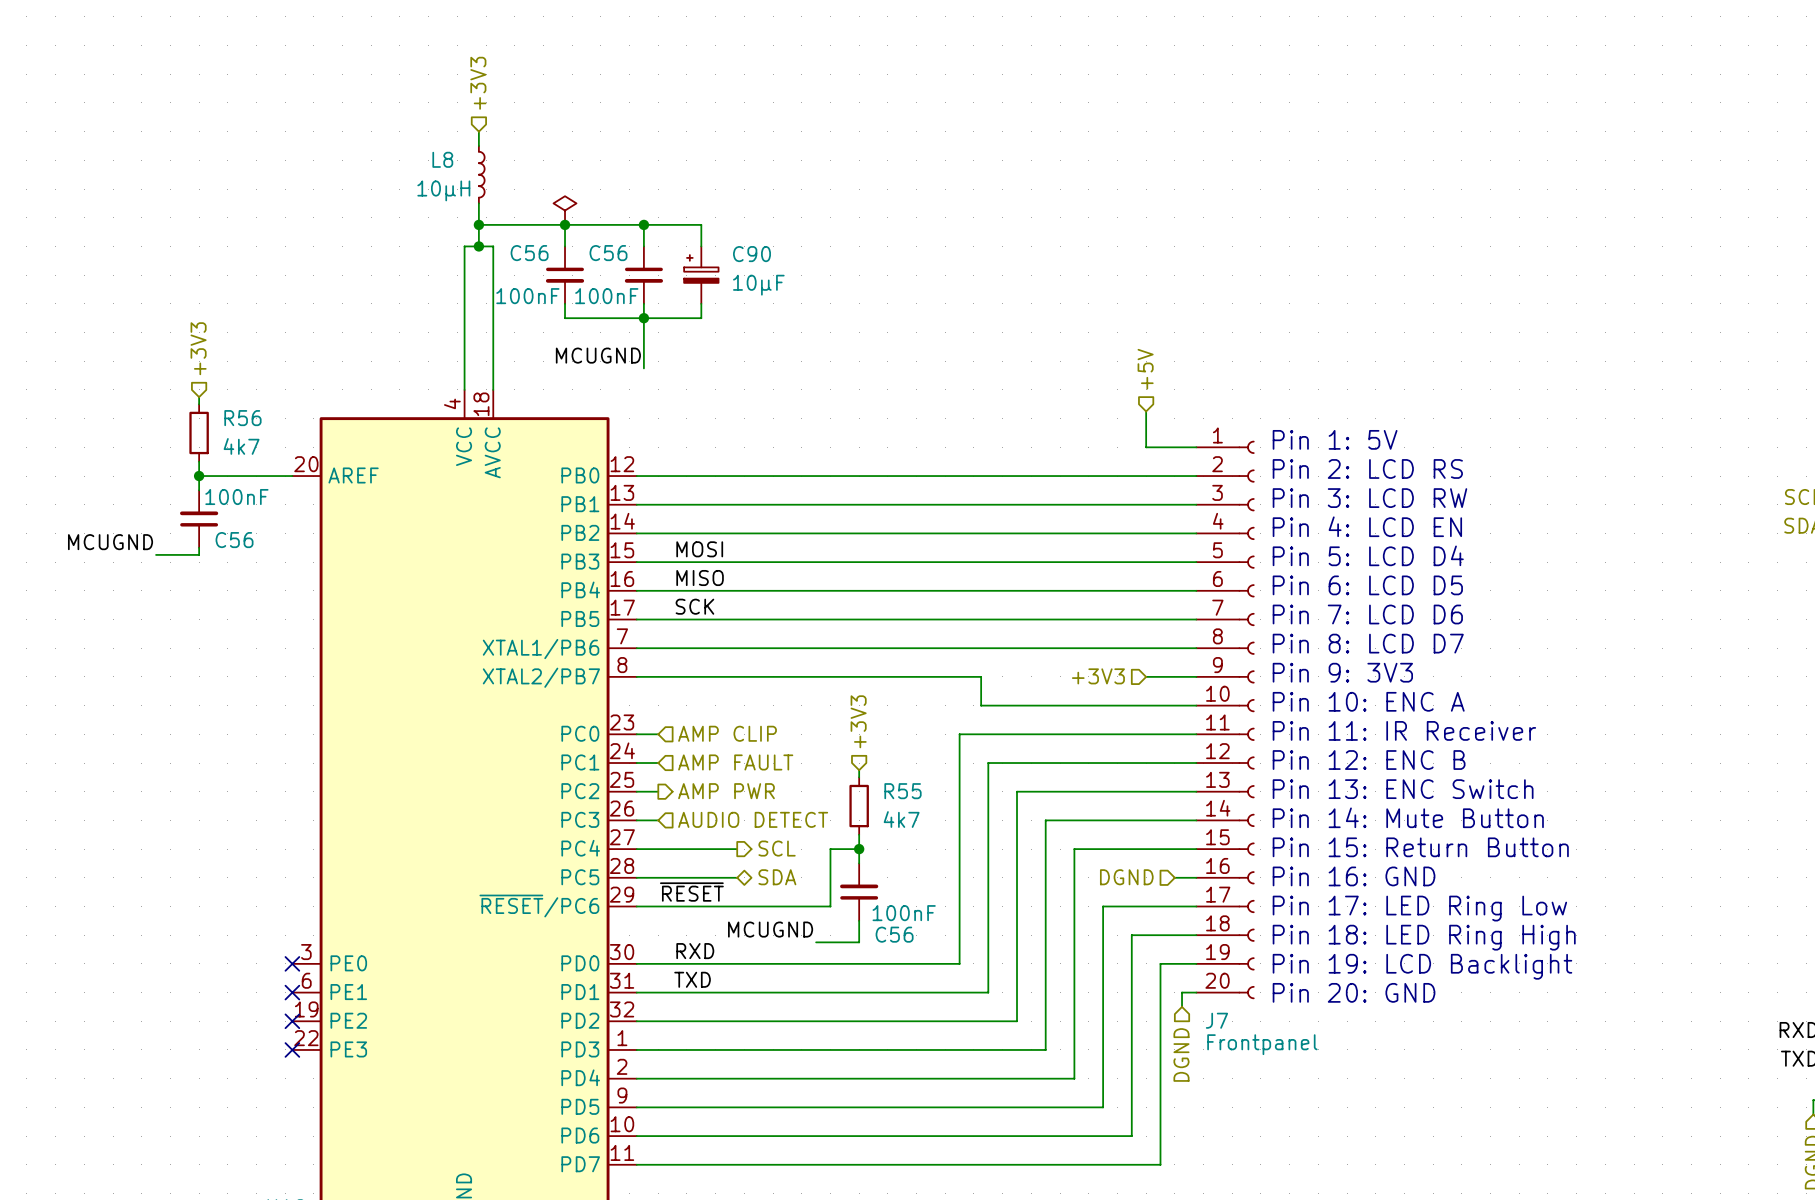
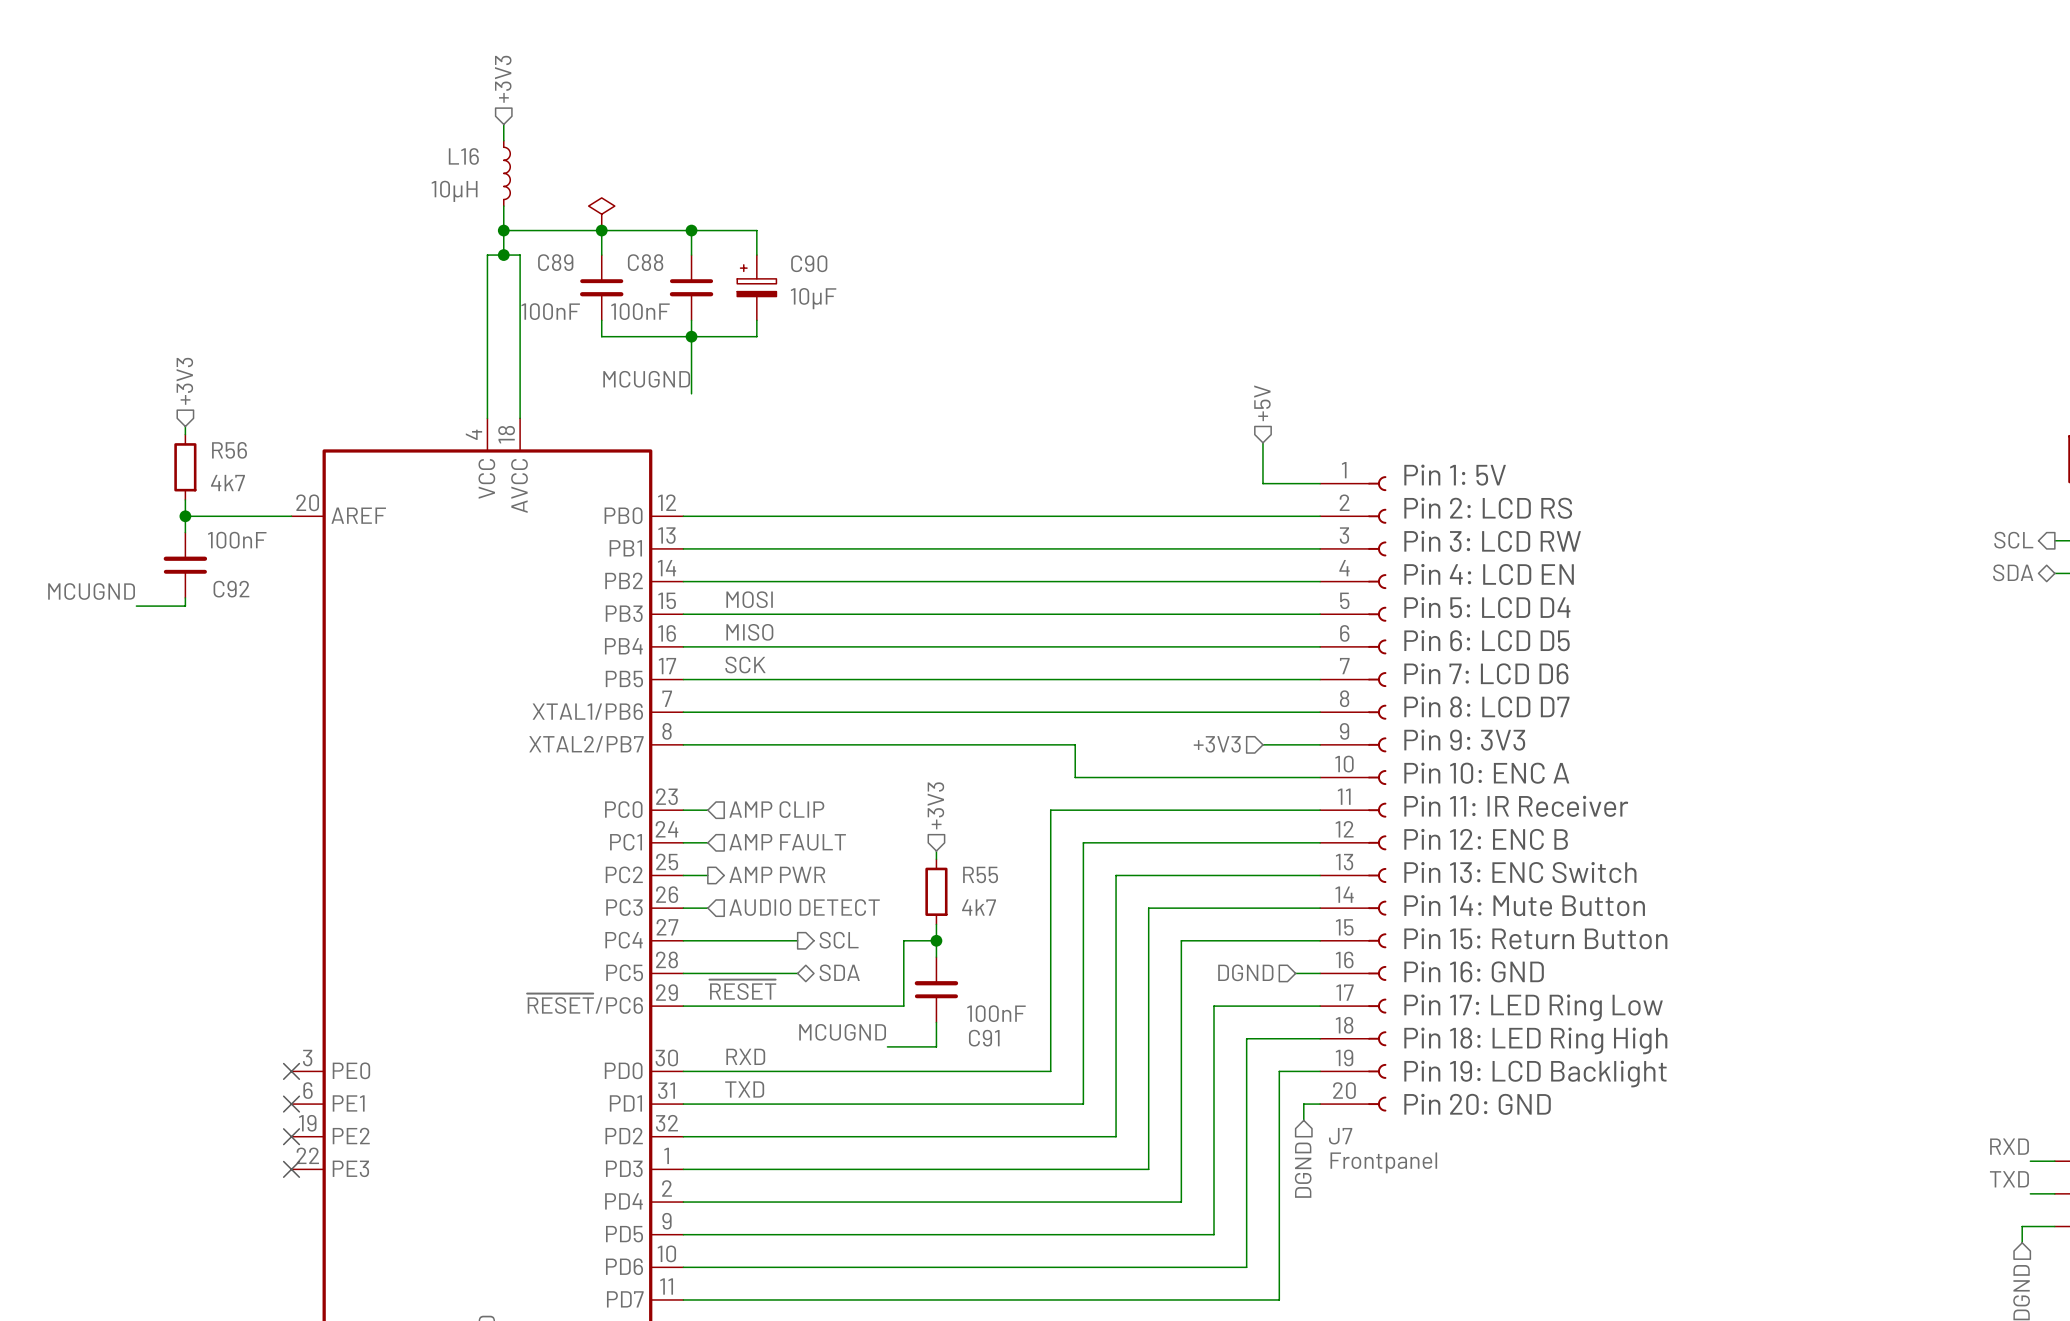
L8 name: L8 (442, 159) -> L16 (463, 156)
C56 name: C56 (529, 253) -> C89 (555, 262)
C56 name: C56 (608, 253) -> C88 (645, 262)
C56 name: C56 (234, 540) -> C92 (231, 589)
C56 name: C56 (894, 934) -> C91 (984, 1038)

